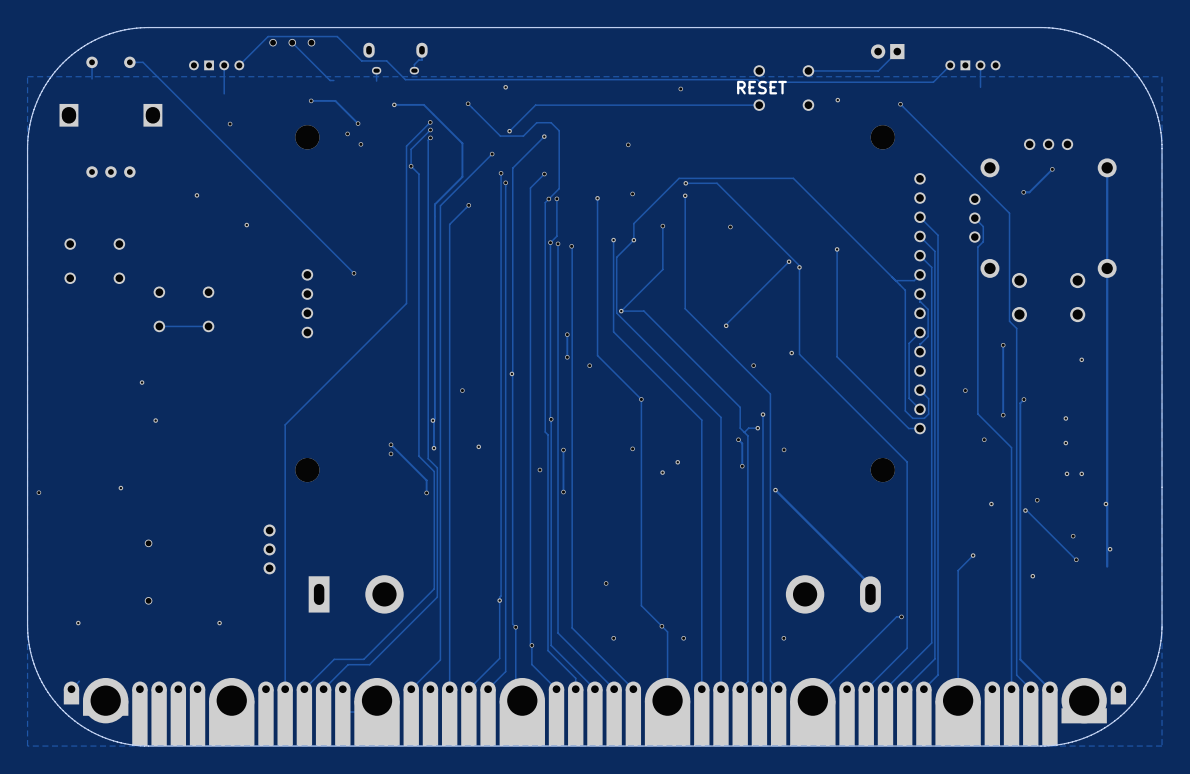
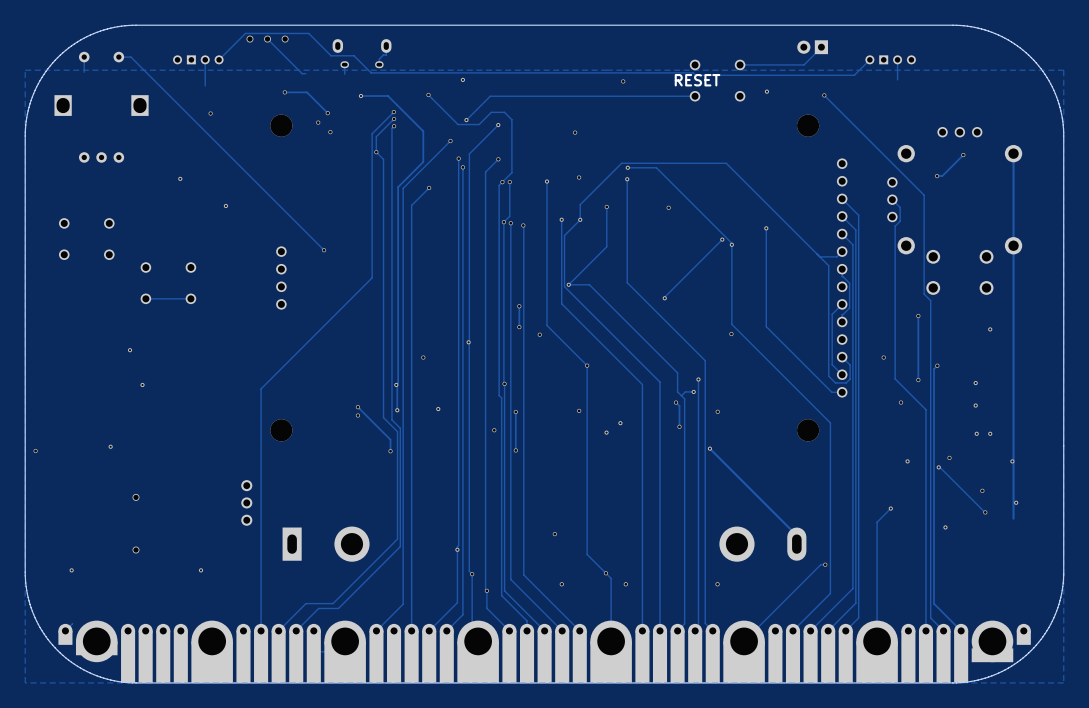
via: (791, 353) -> none
via: none -> (731, 334)
via: (753, 365) -> none

